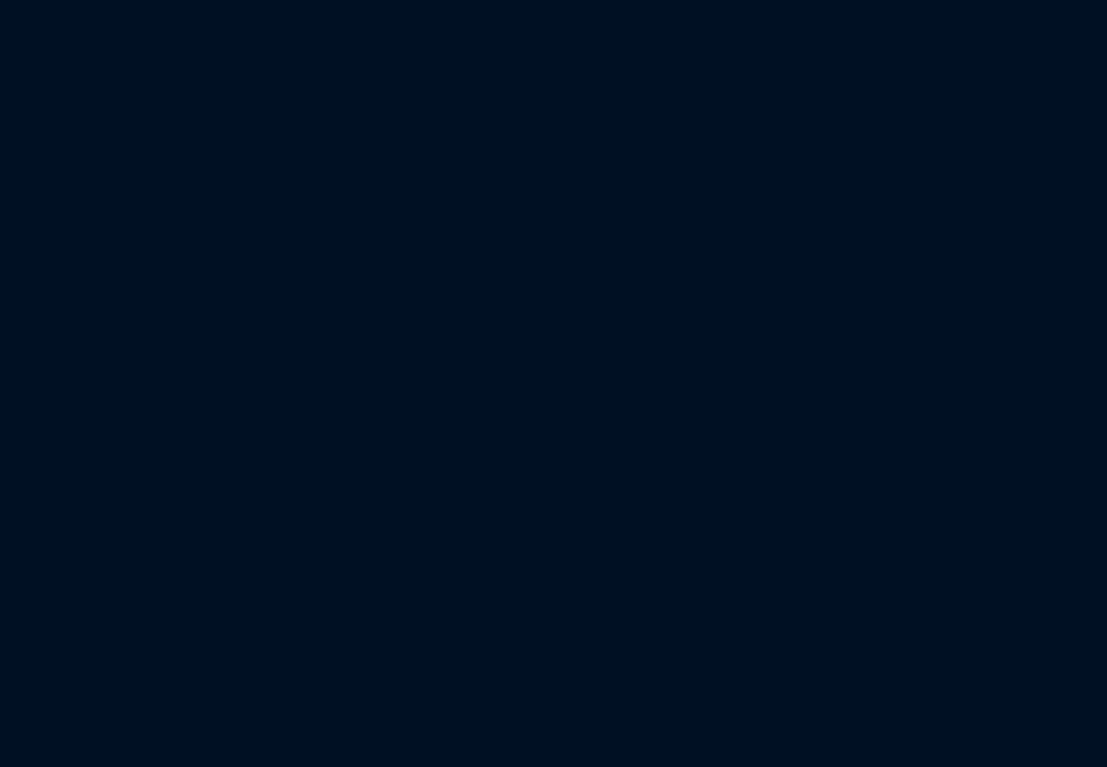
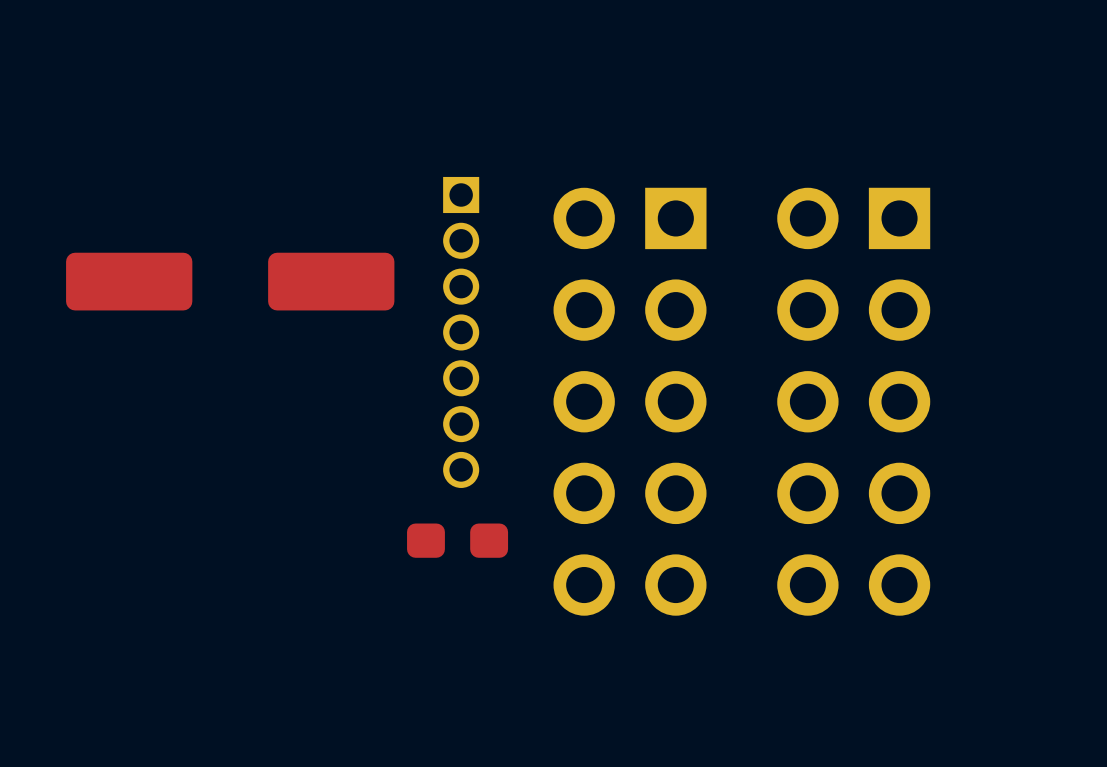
part: none -> (230, 281)
part: none -> (461, 332)
part: none -> (630, 401)
part: none -> (853, 401)
part: none -> (457, 540)

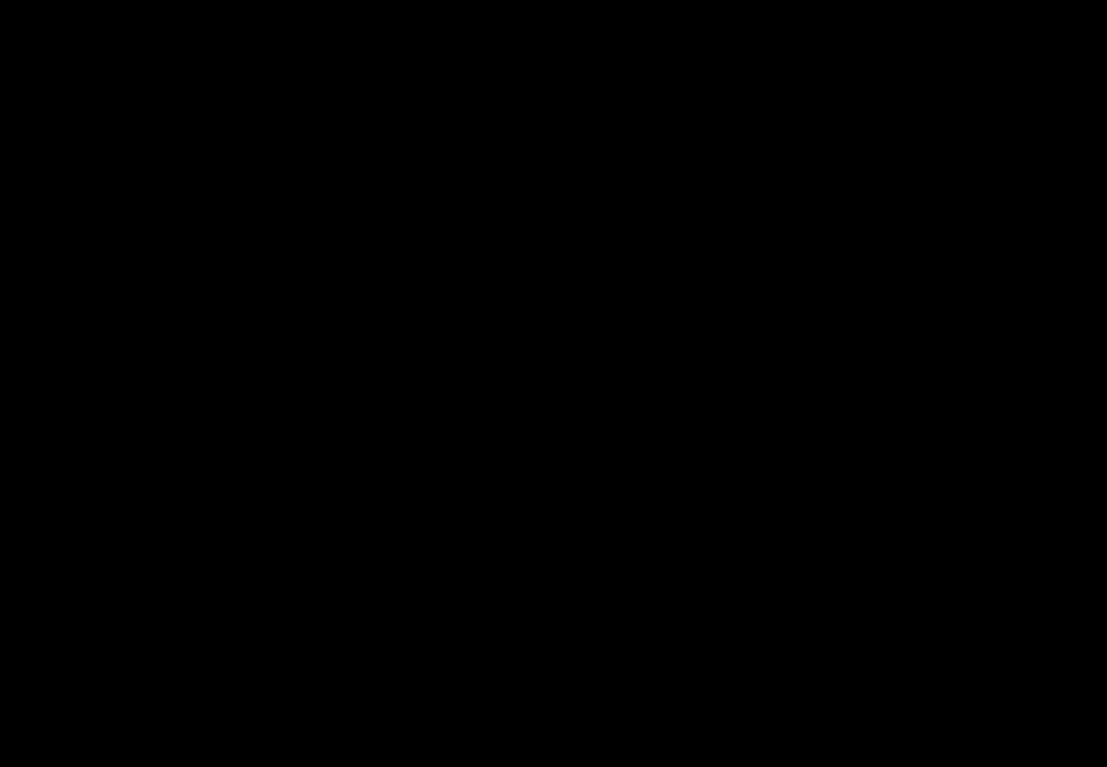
part: (230, 281) -> none
part: (461, 332) -> none
part: (630, 401) -> none
part: (853, 401) -> none
part: (457, 540) -> none

